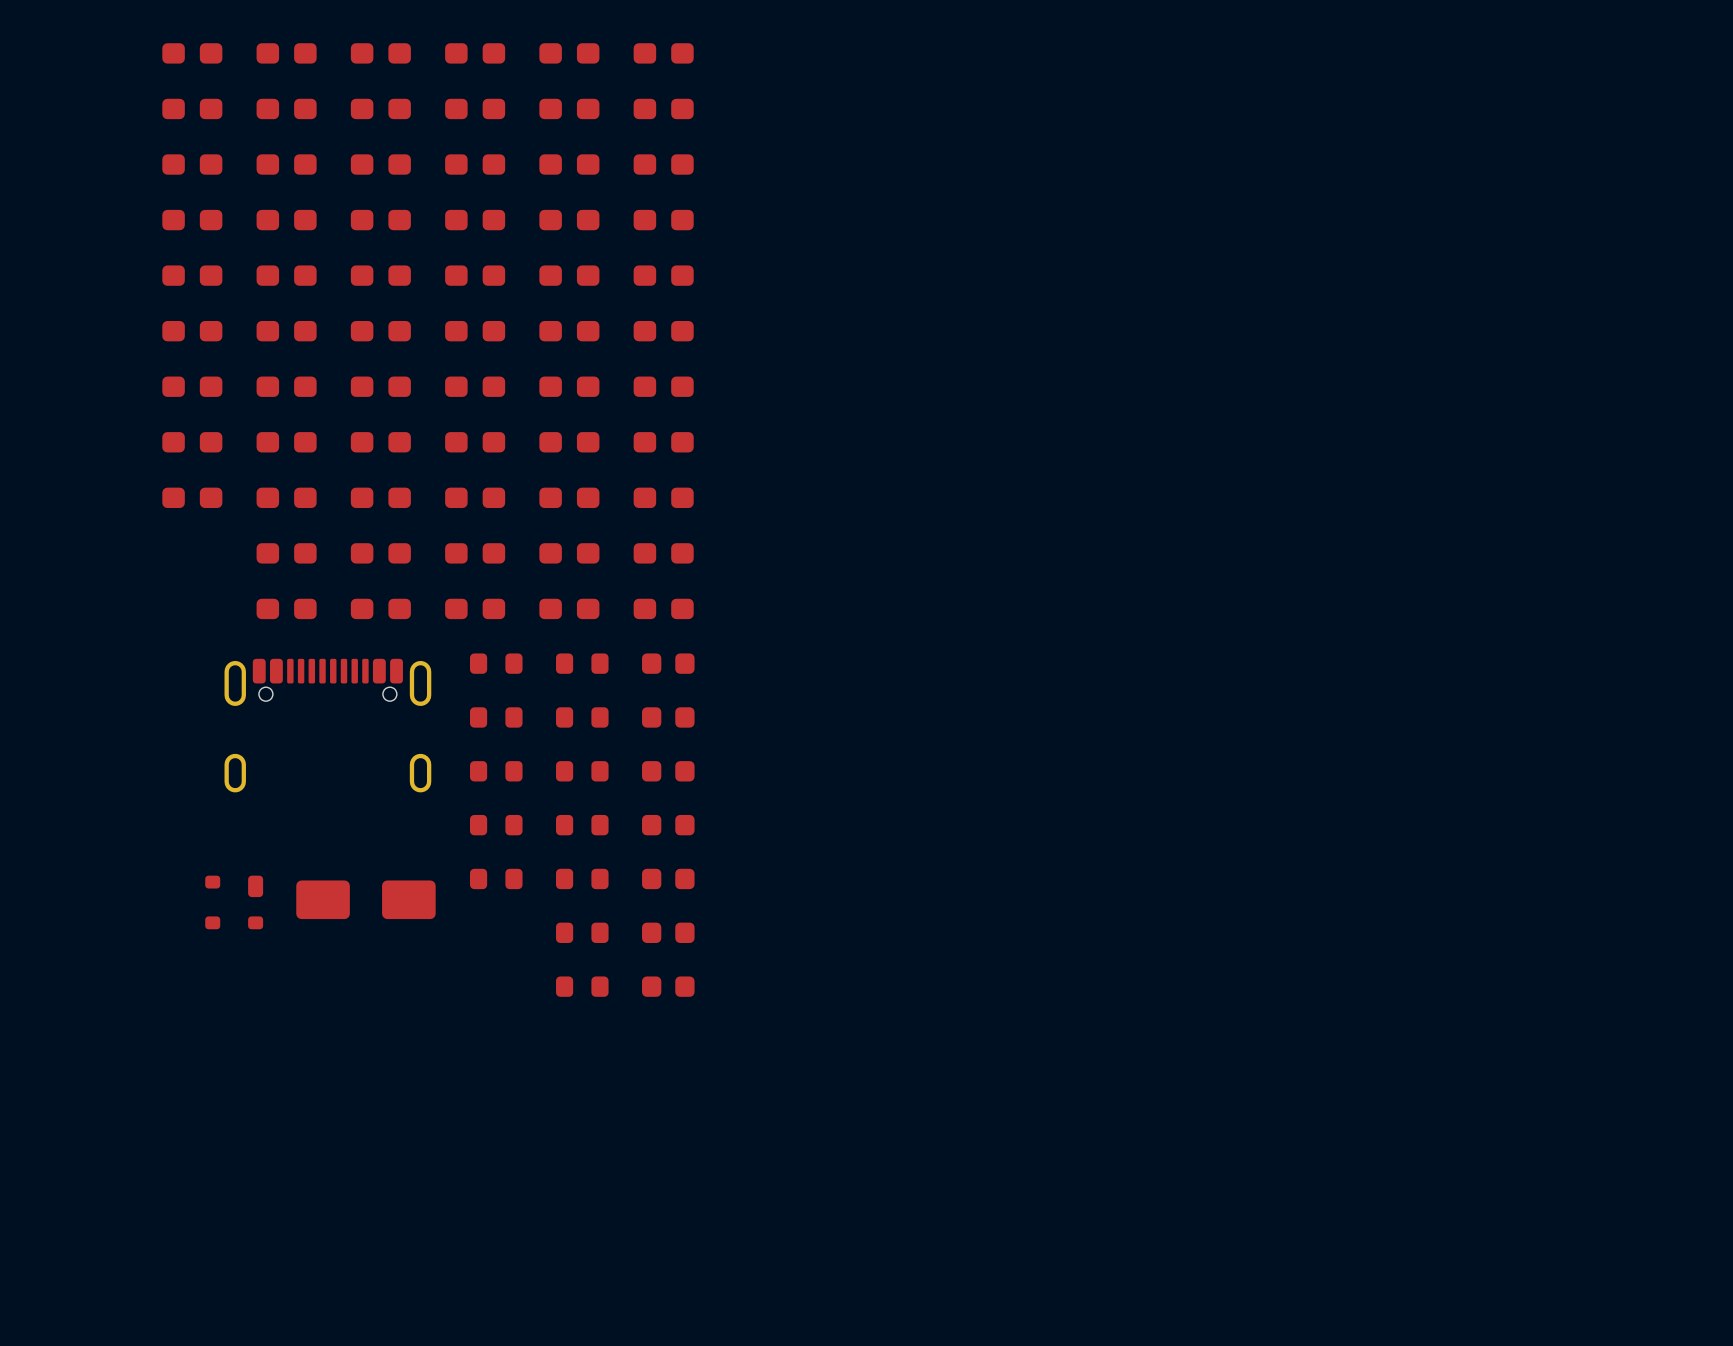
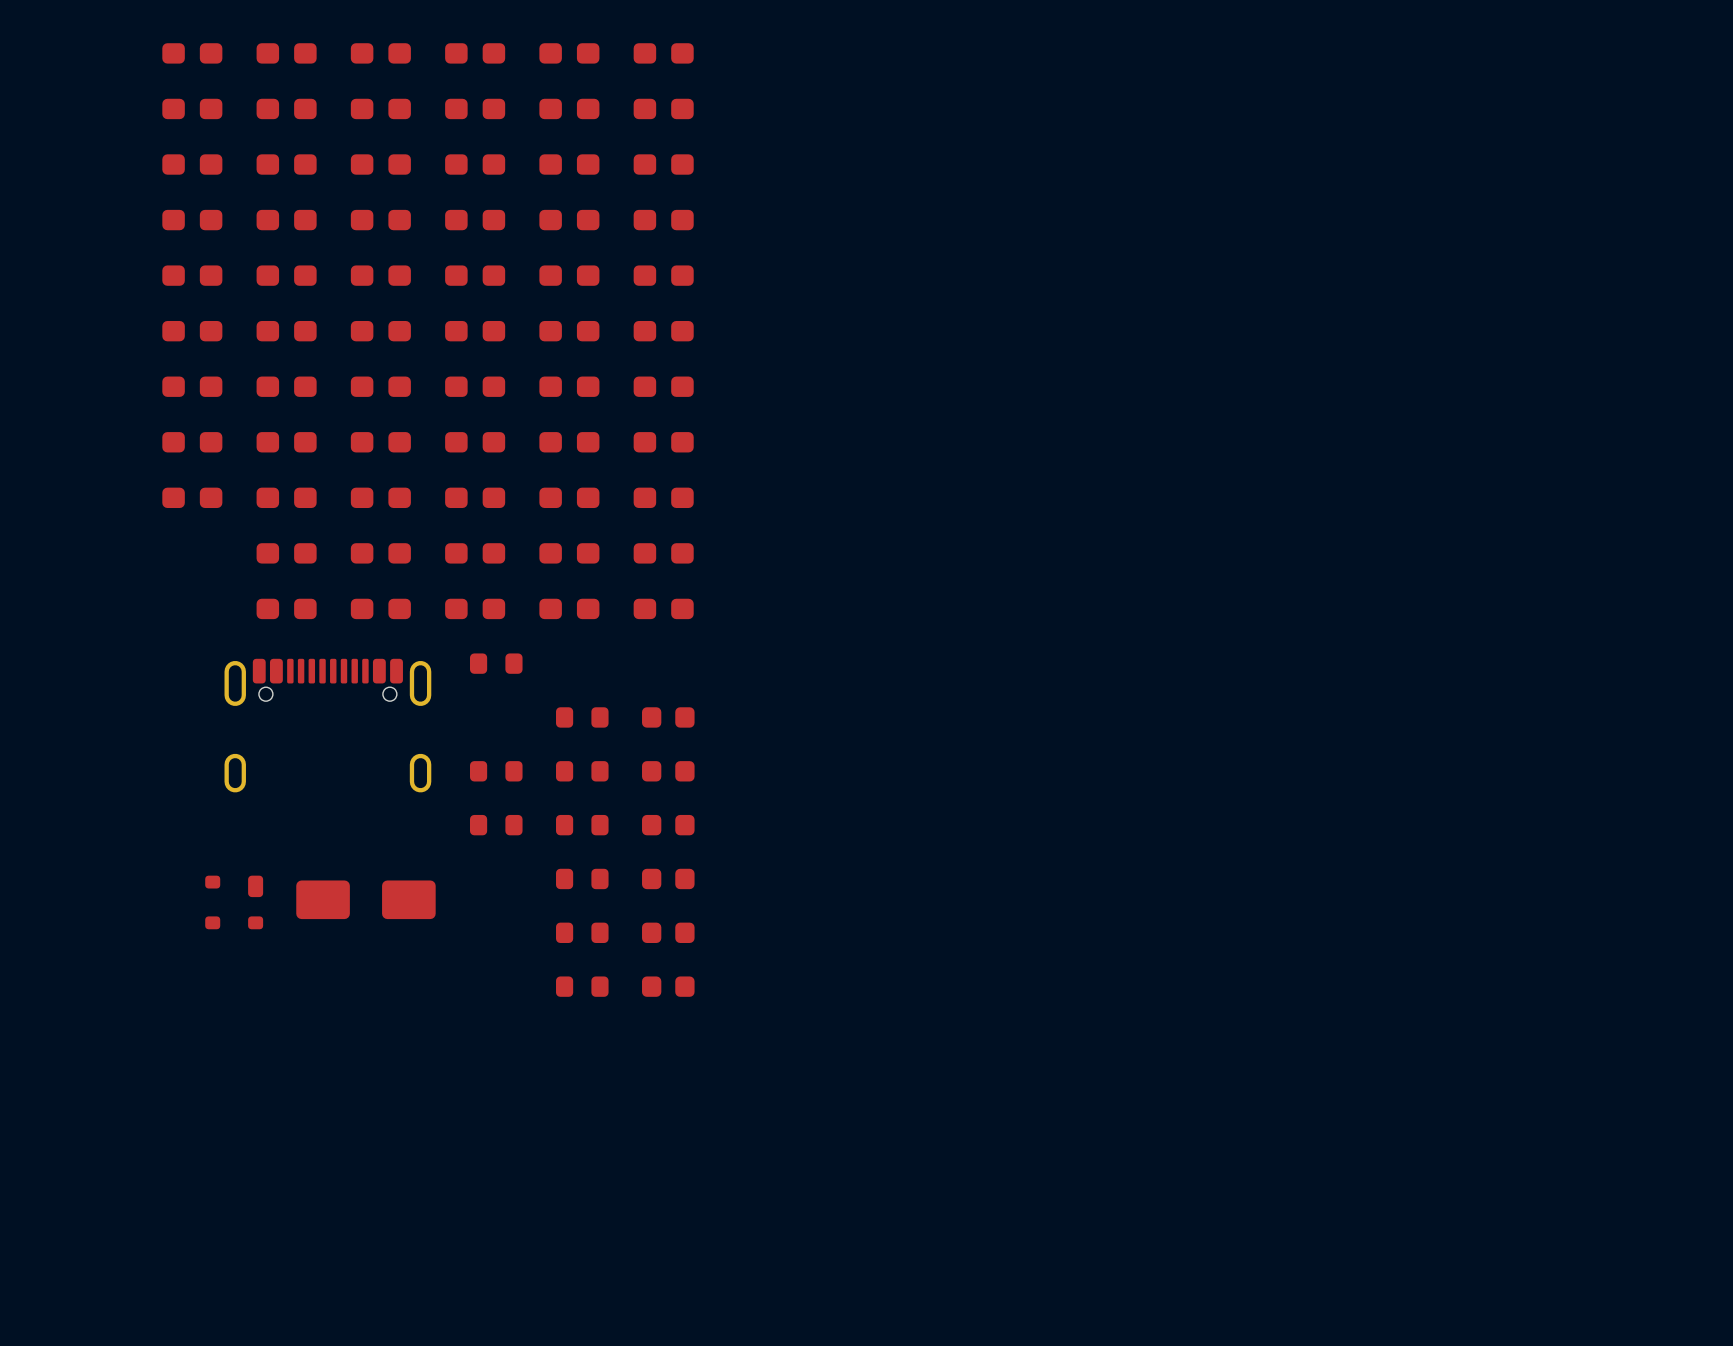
part: (582, 663) -> none
part: (668, 663) -> none
part: (496, 717) -> none
part: (496, 878) -> none

